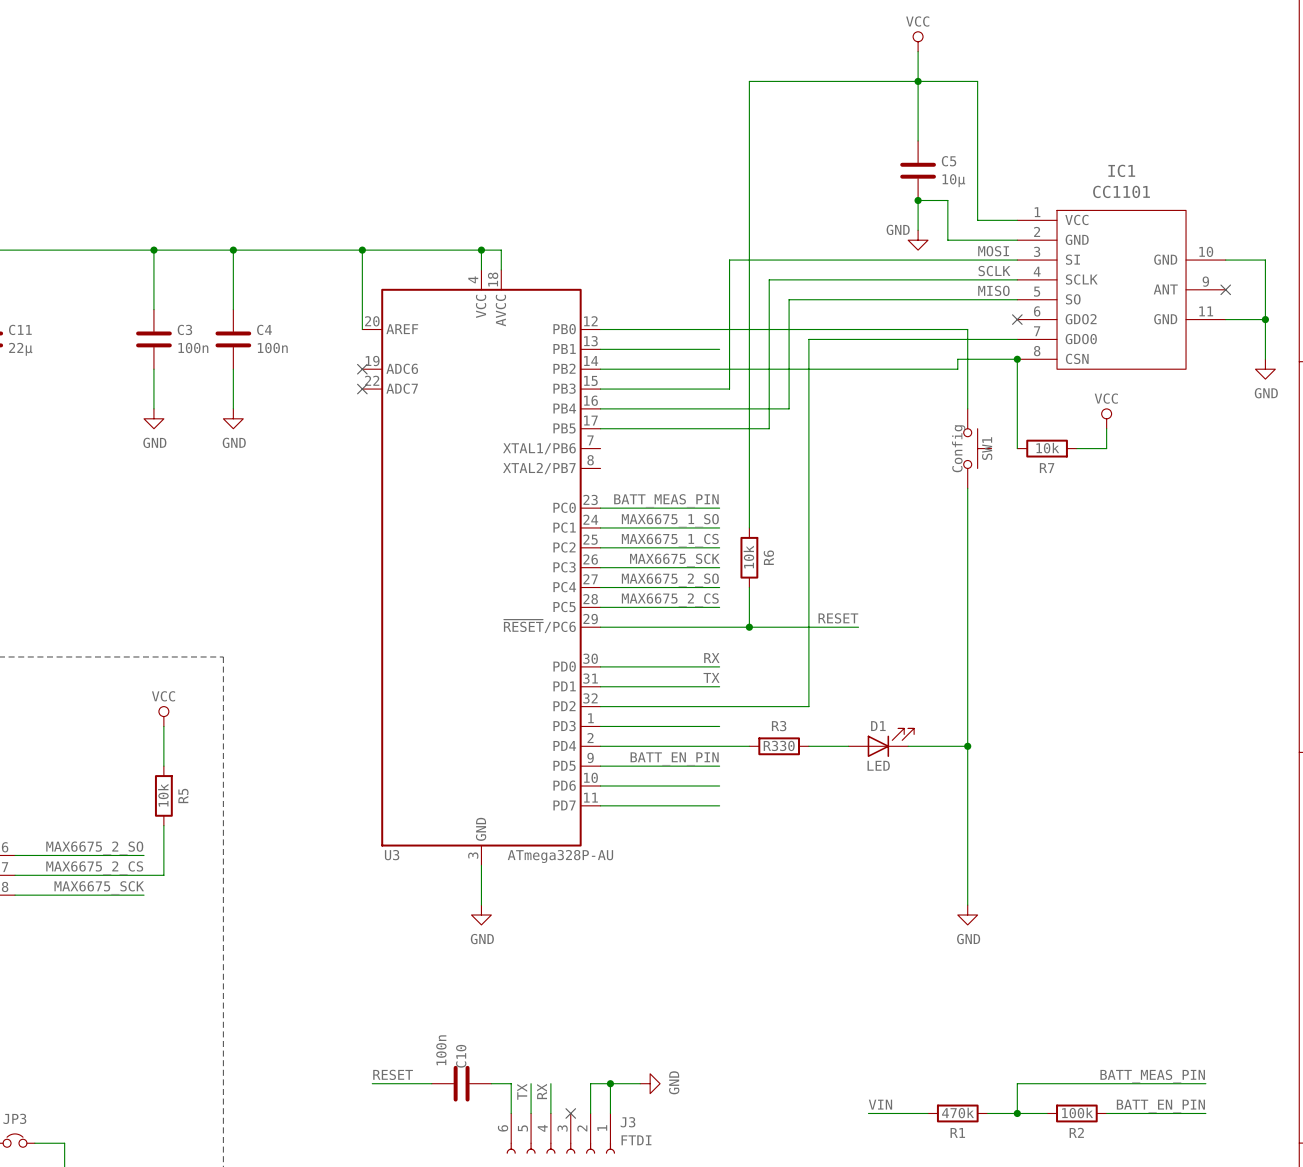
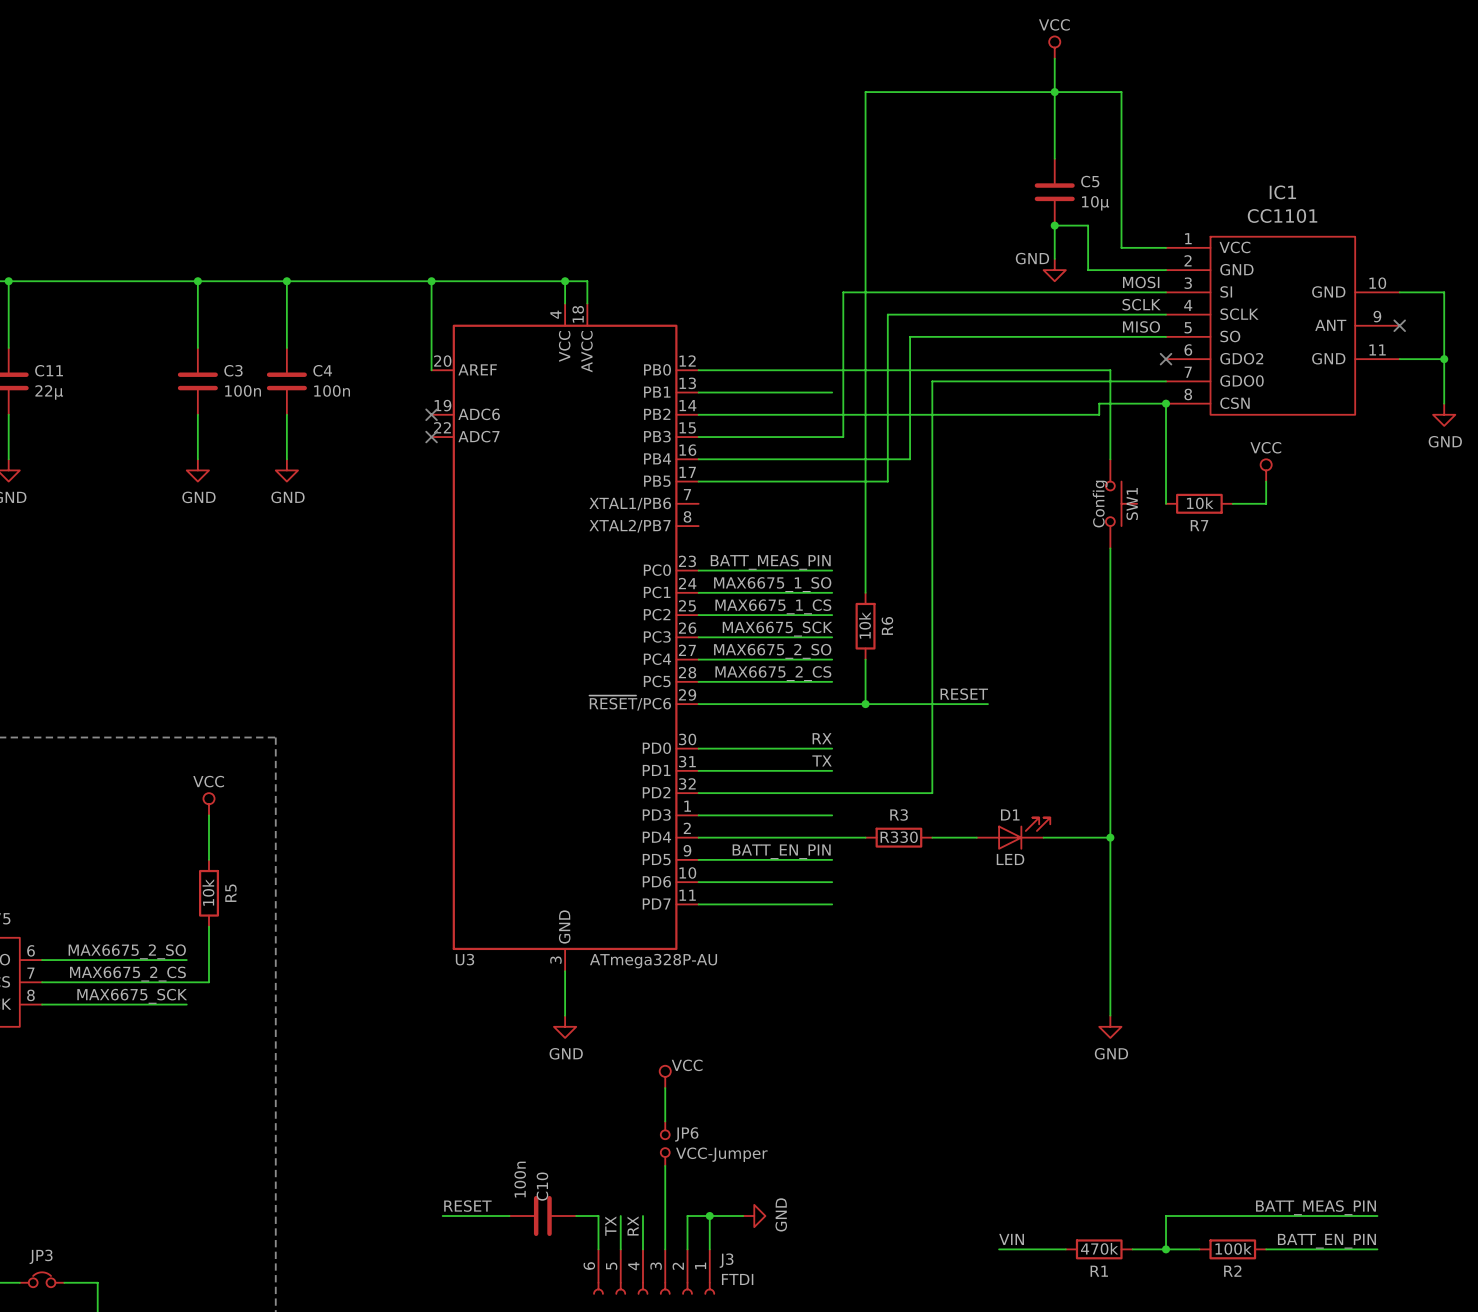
power symbol: none -> VCC (665, 1076)
wire: none -> (665, 1088) (665, 1121)
JP6: none -> VCC-Jumper (665, 1143)
wire: none -> (665, 1165) (665, 1249)
no-connect mark: (570, 1113) -> none

